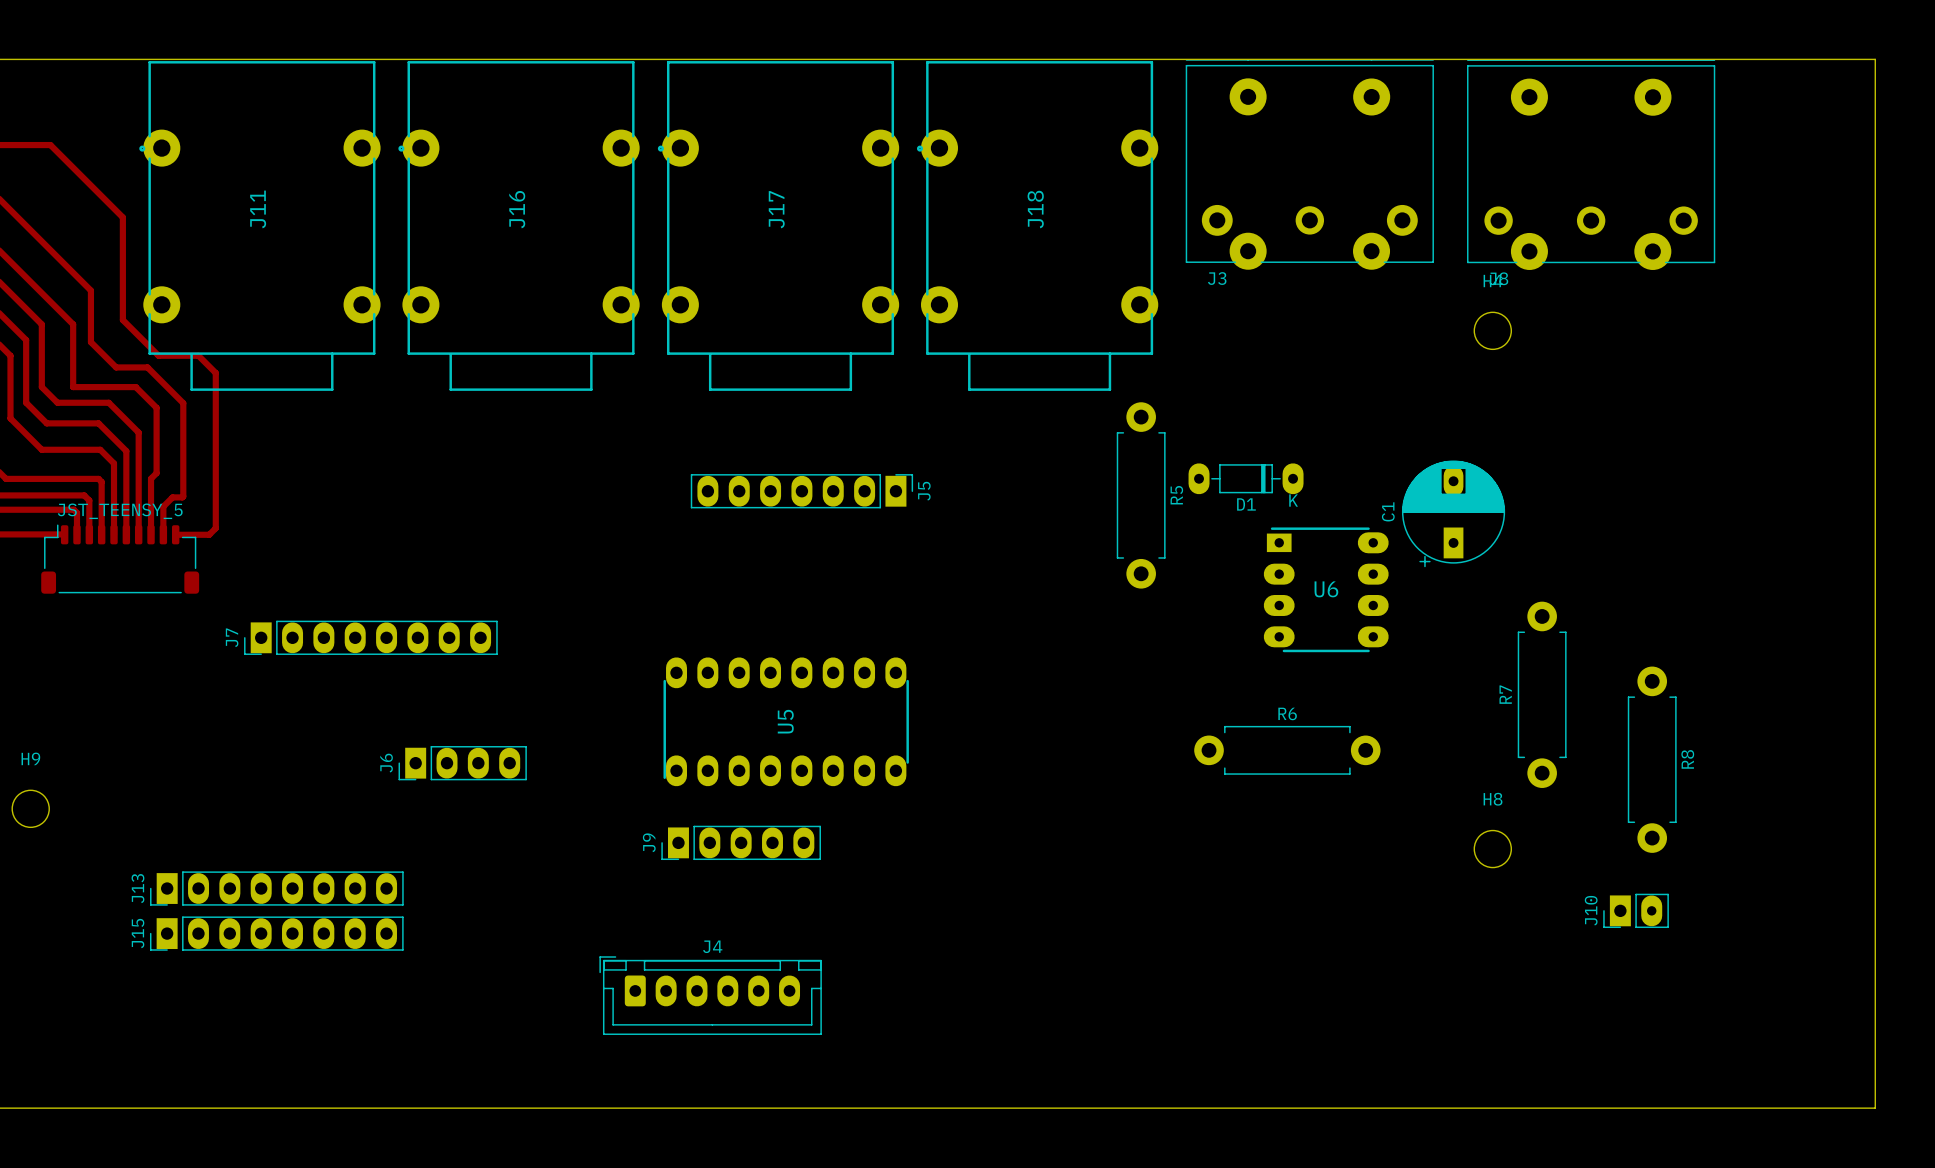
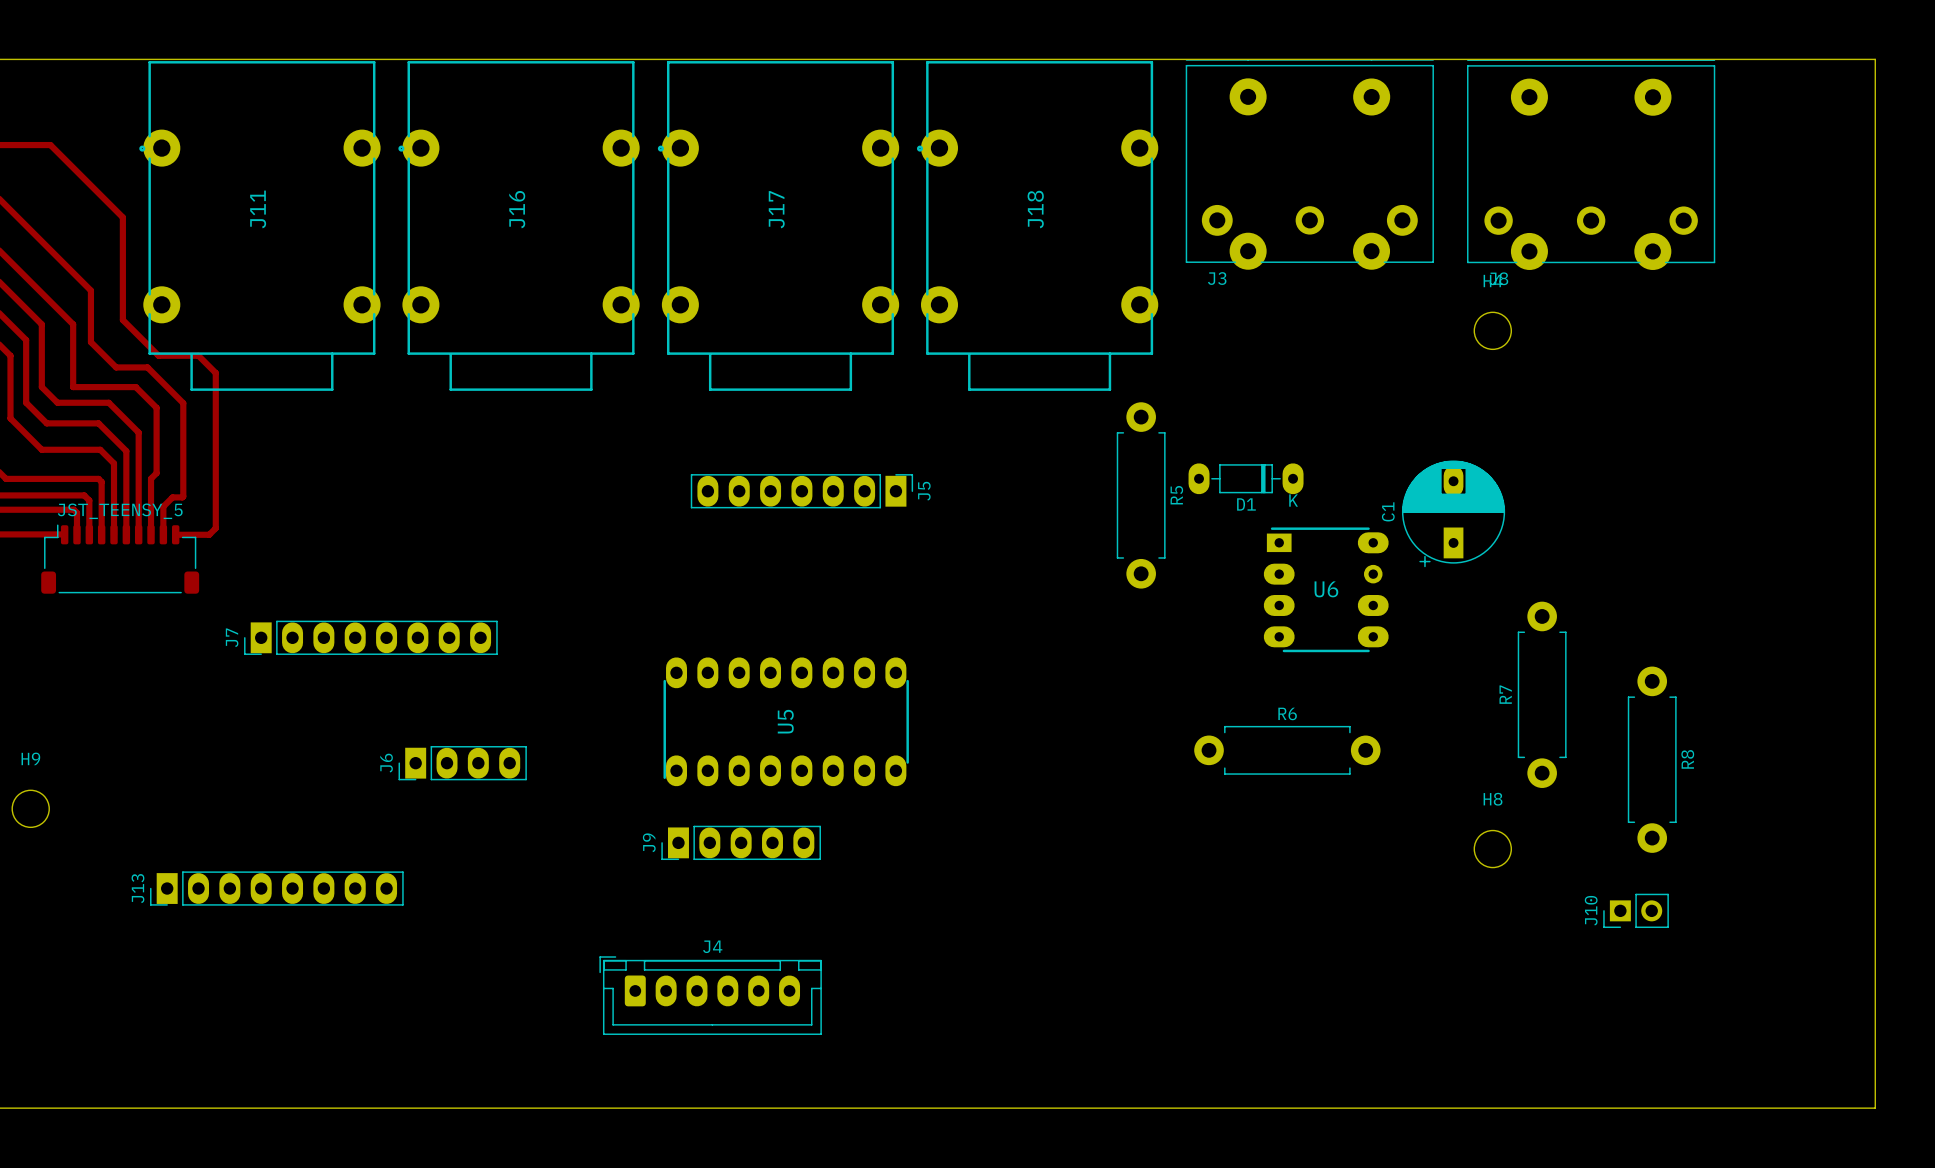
U6 footprint: [1263, 527, 1389, 653] -> [1263, 527, 1389, 653]
J10 footprint: [1603, 893, 1669, 929] -> [1603, 893, 1669, 929]
J15: (276, 933) -> none

